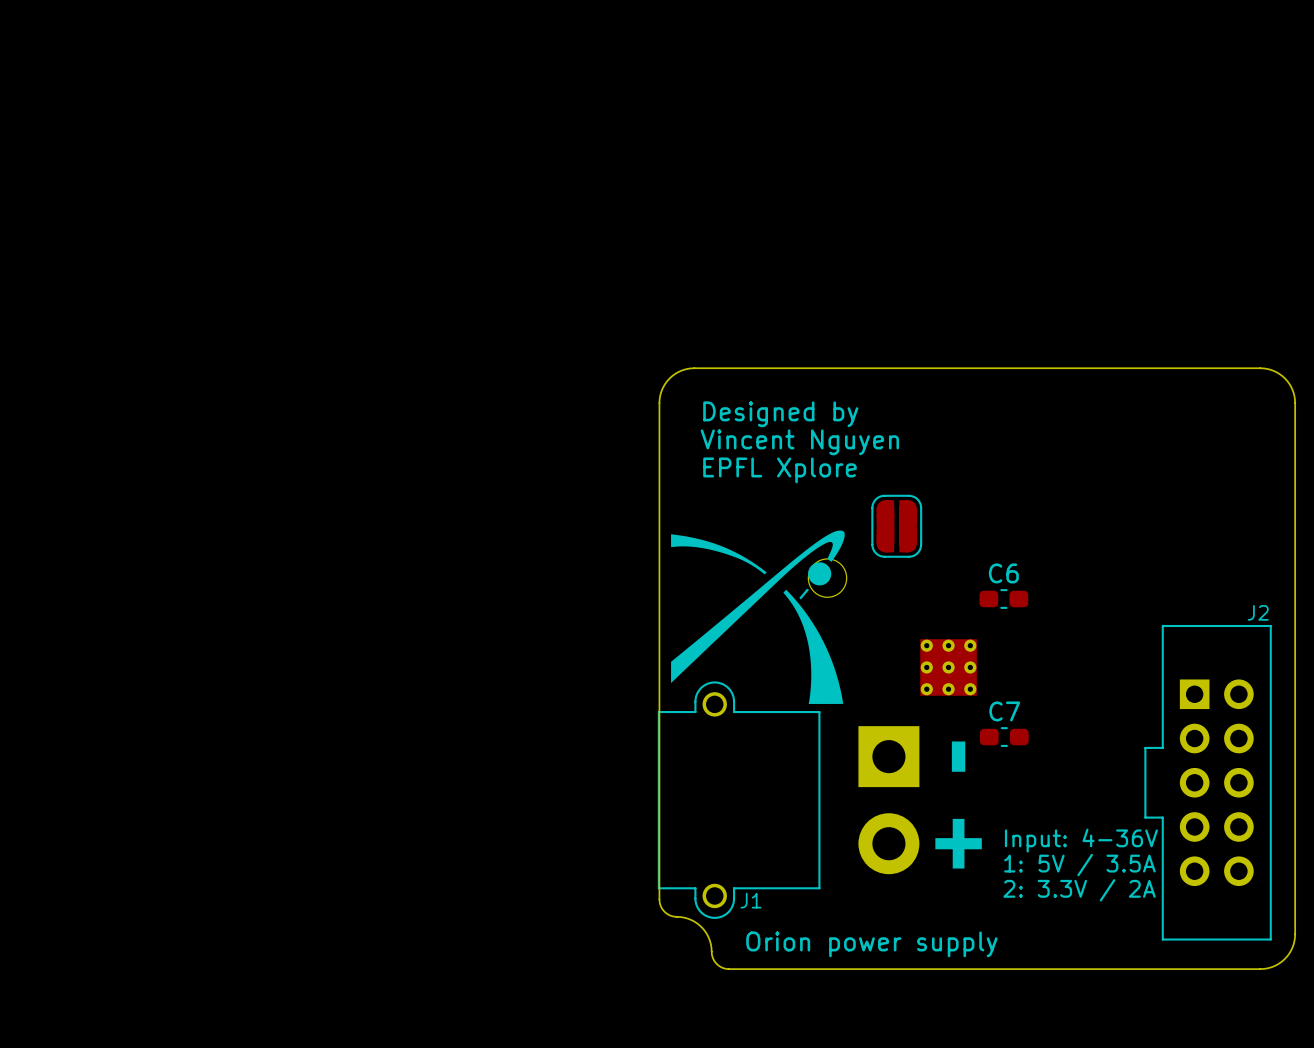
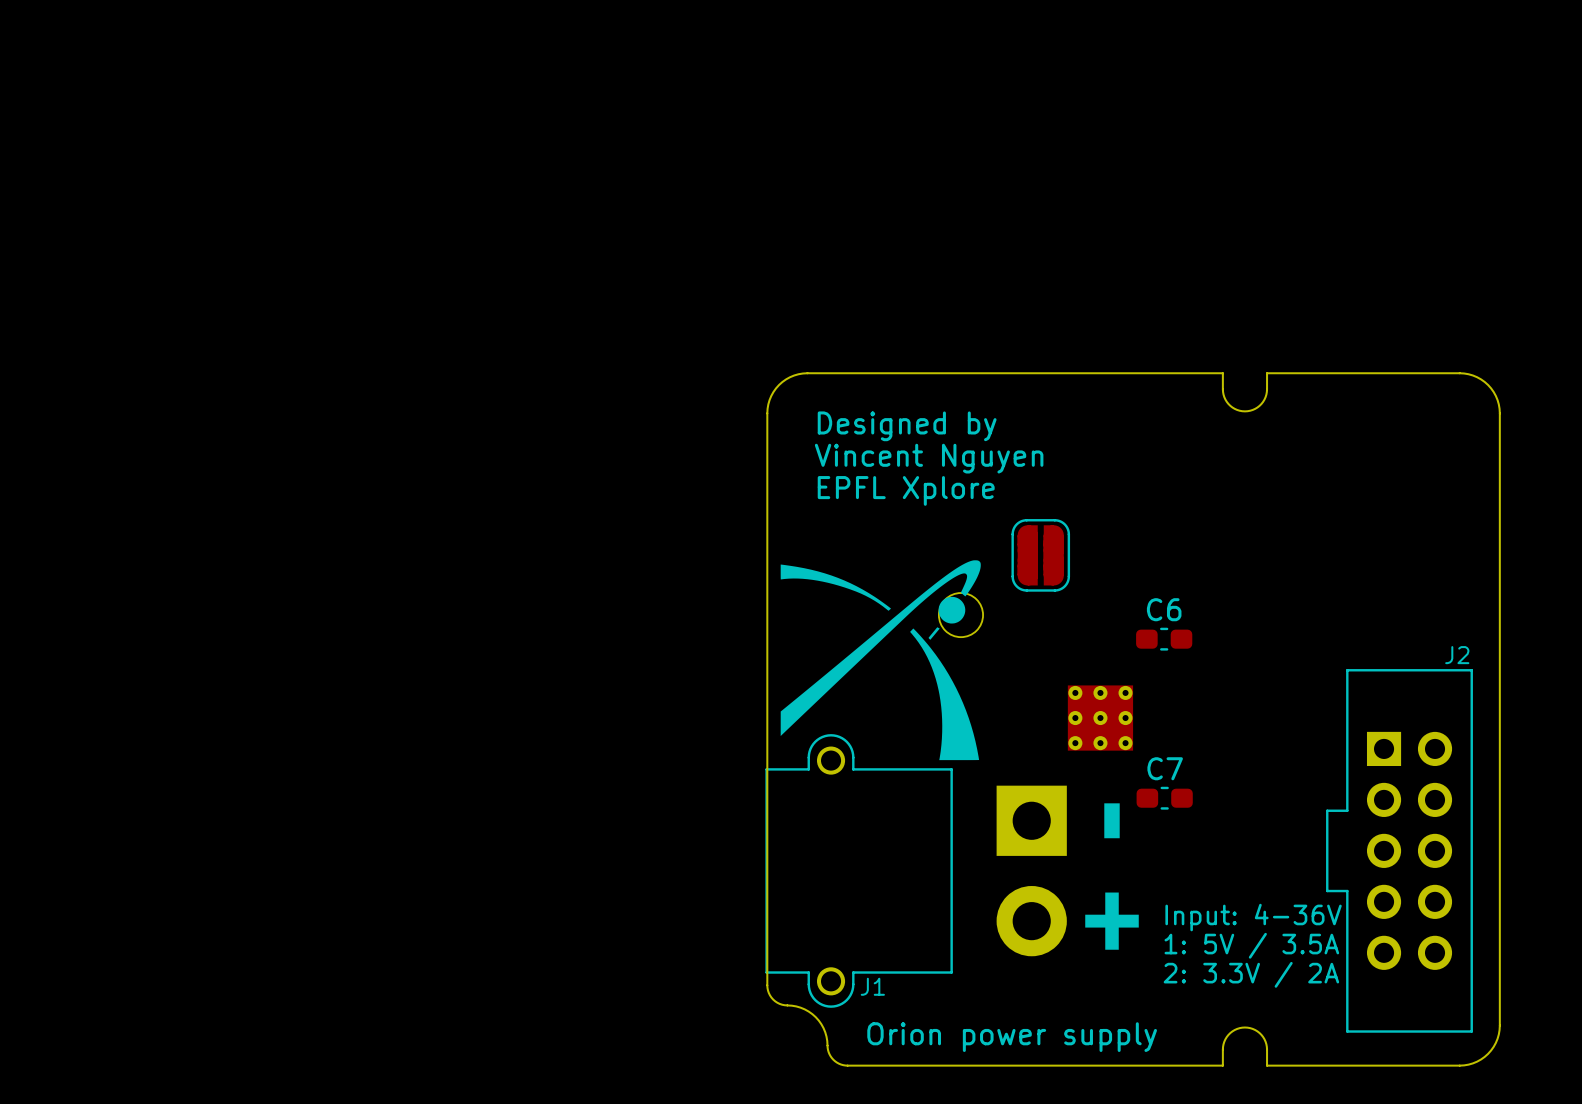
board edge: (1054, 368) (1093, 368) -> (1222, 373) (1223, 391) (1225, 399) (1232, 407) (1244, 411) (1257, 407) (1264, 399) (1266, 391) (1267, 373)
board edge: (1054, 969) (1093, 969) -> (1222, 1065) (1223, 1046) (1225, 1039) (1232, 1031) (1244, 1027) (1257, 1031) (1264, 1039) (1266, 1046) (1267, 1065)

